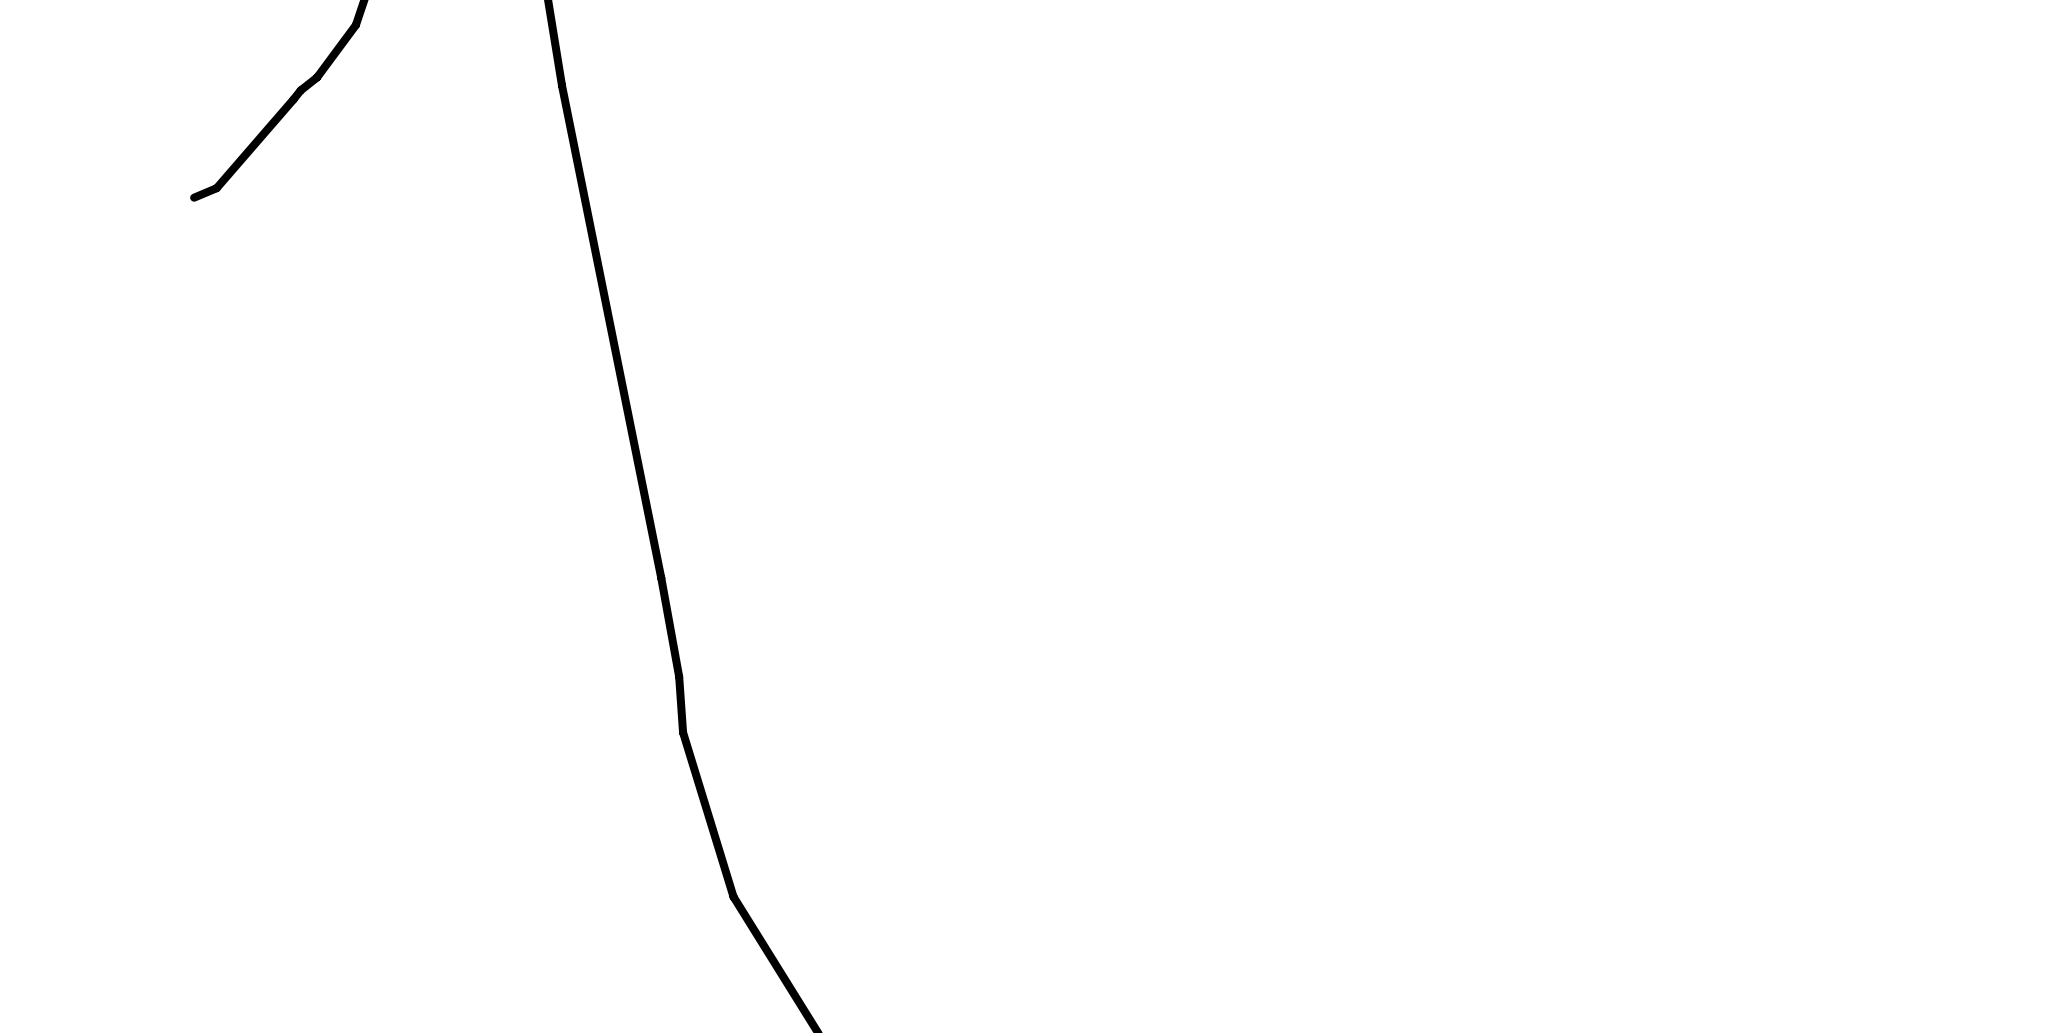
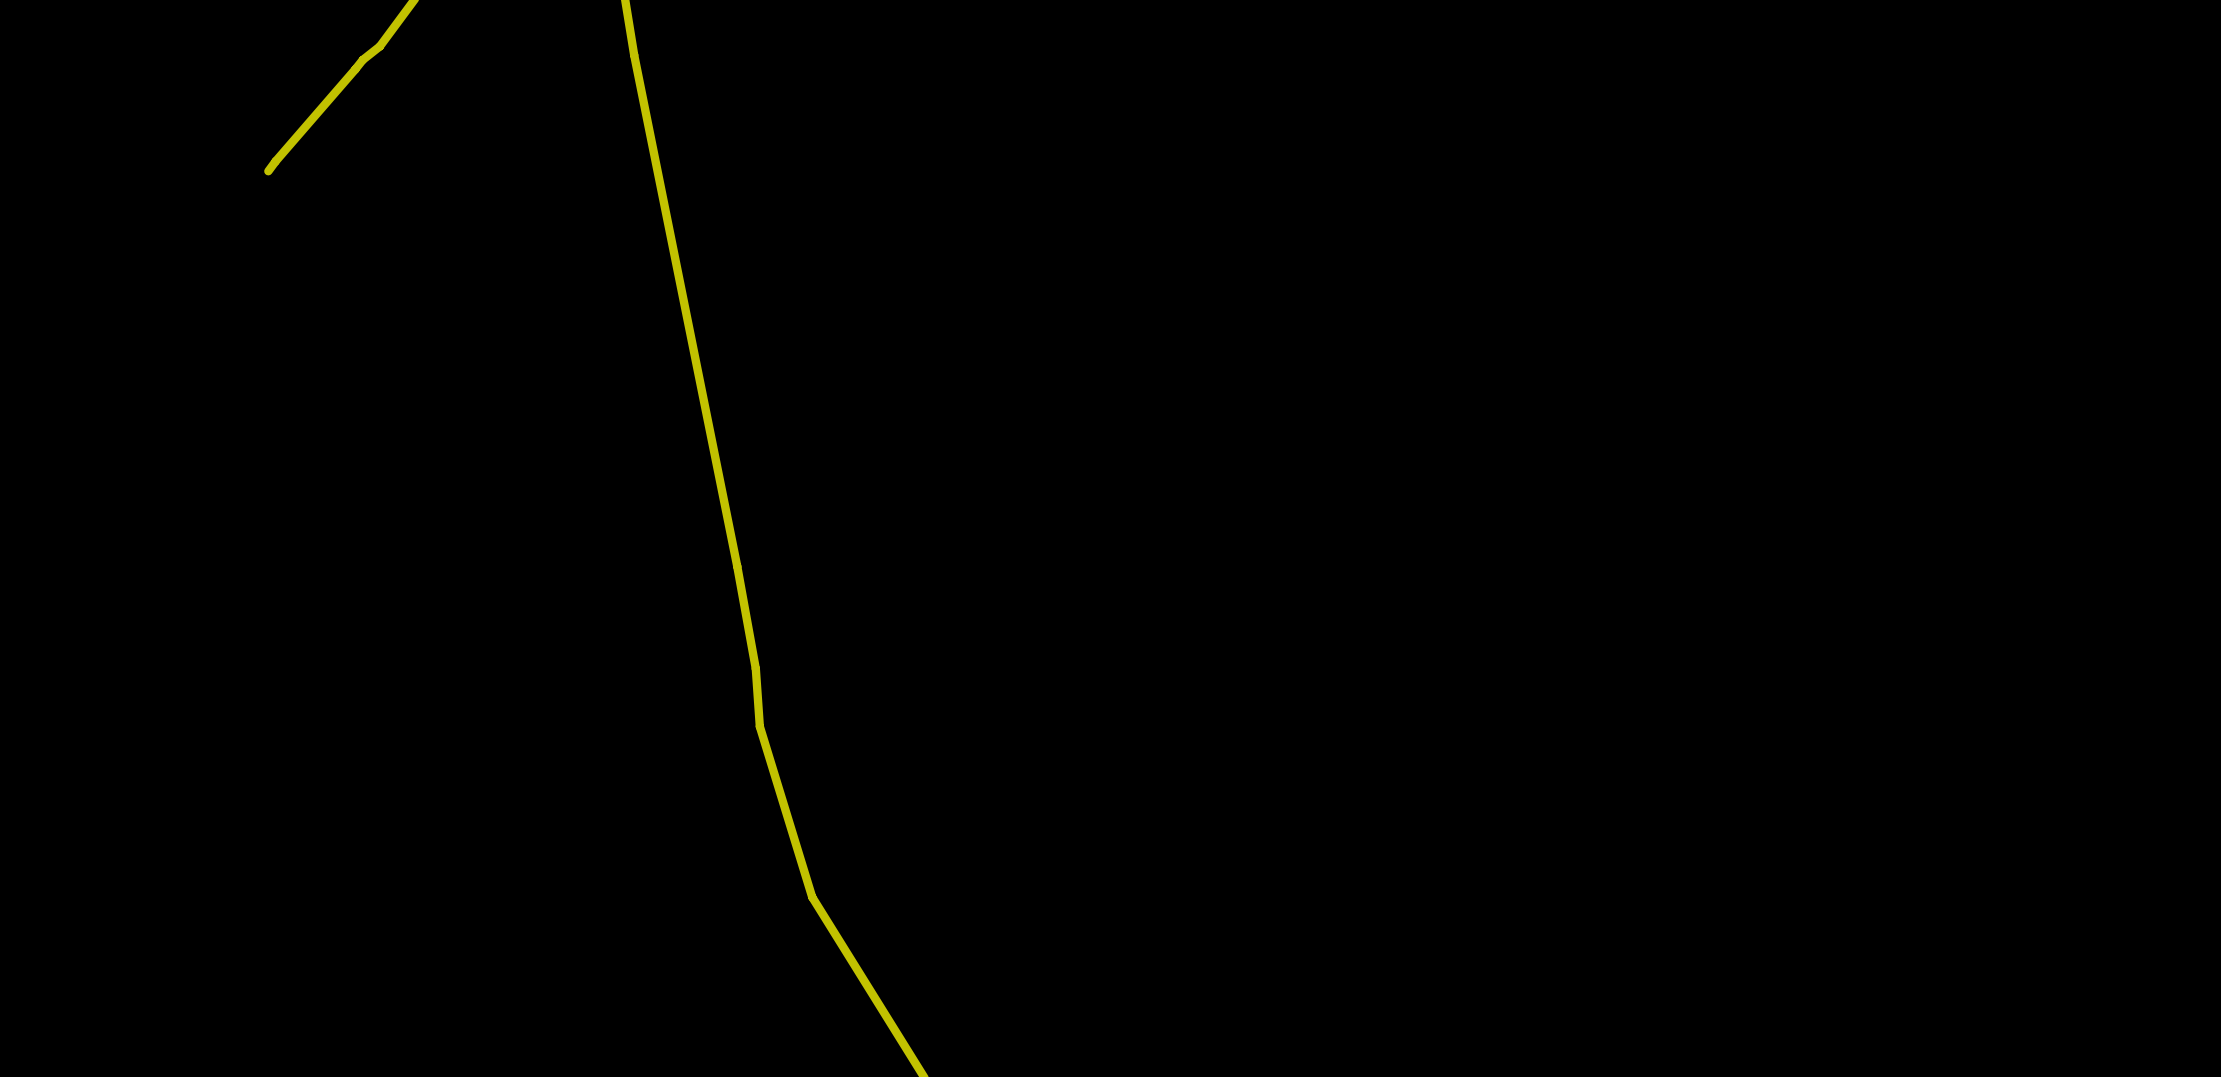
board edge: (216, 188) (194, 197) -> (275, 161) (268, 171)

